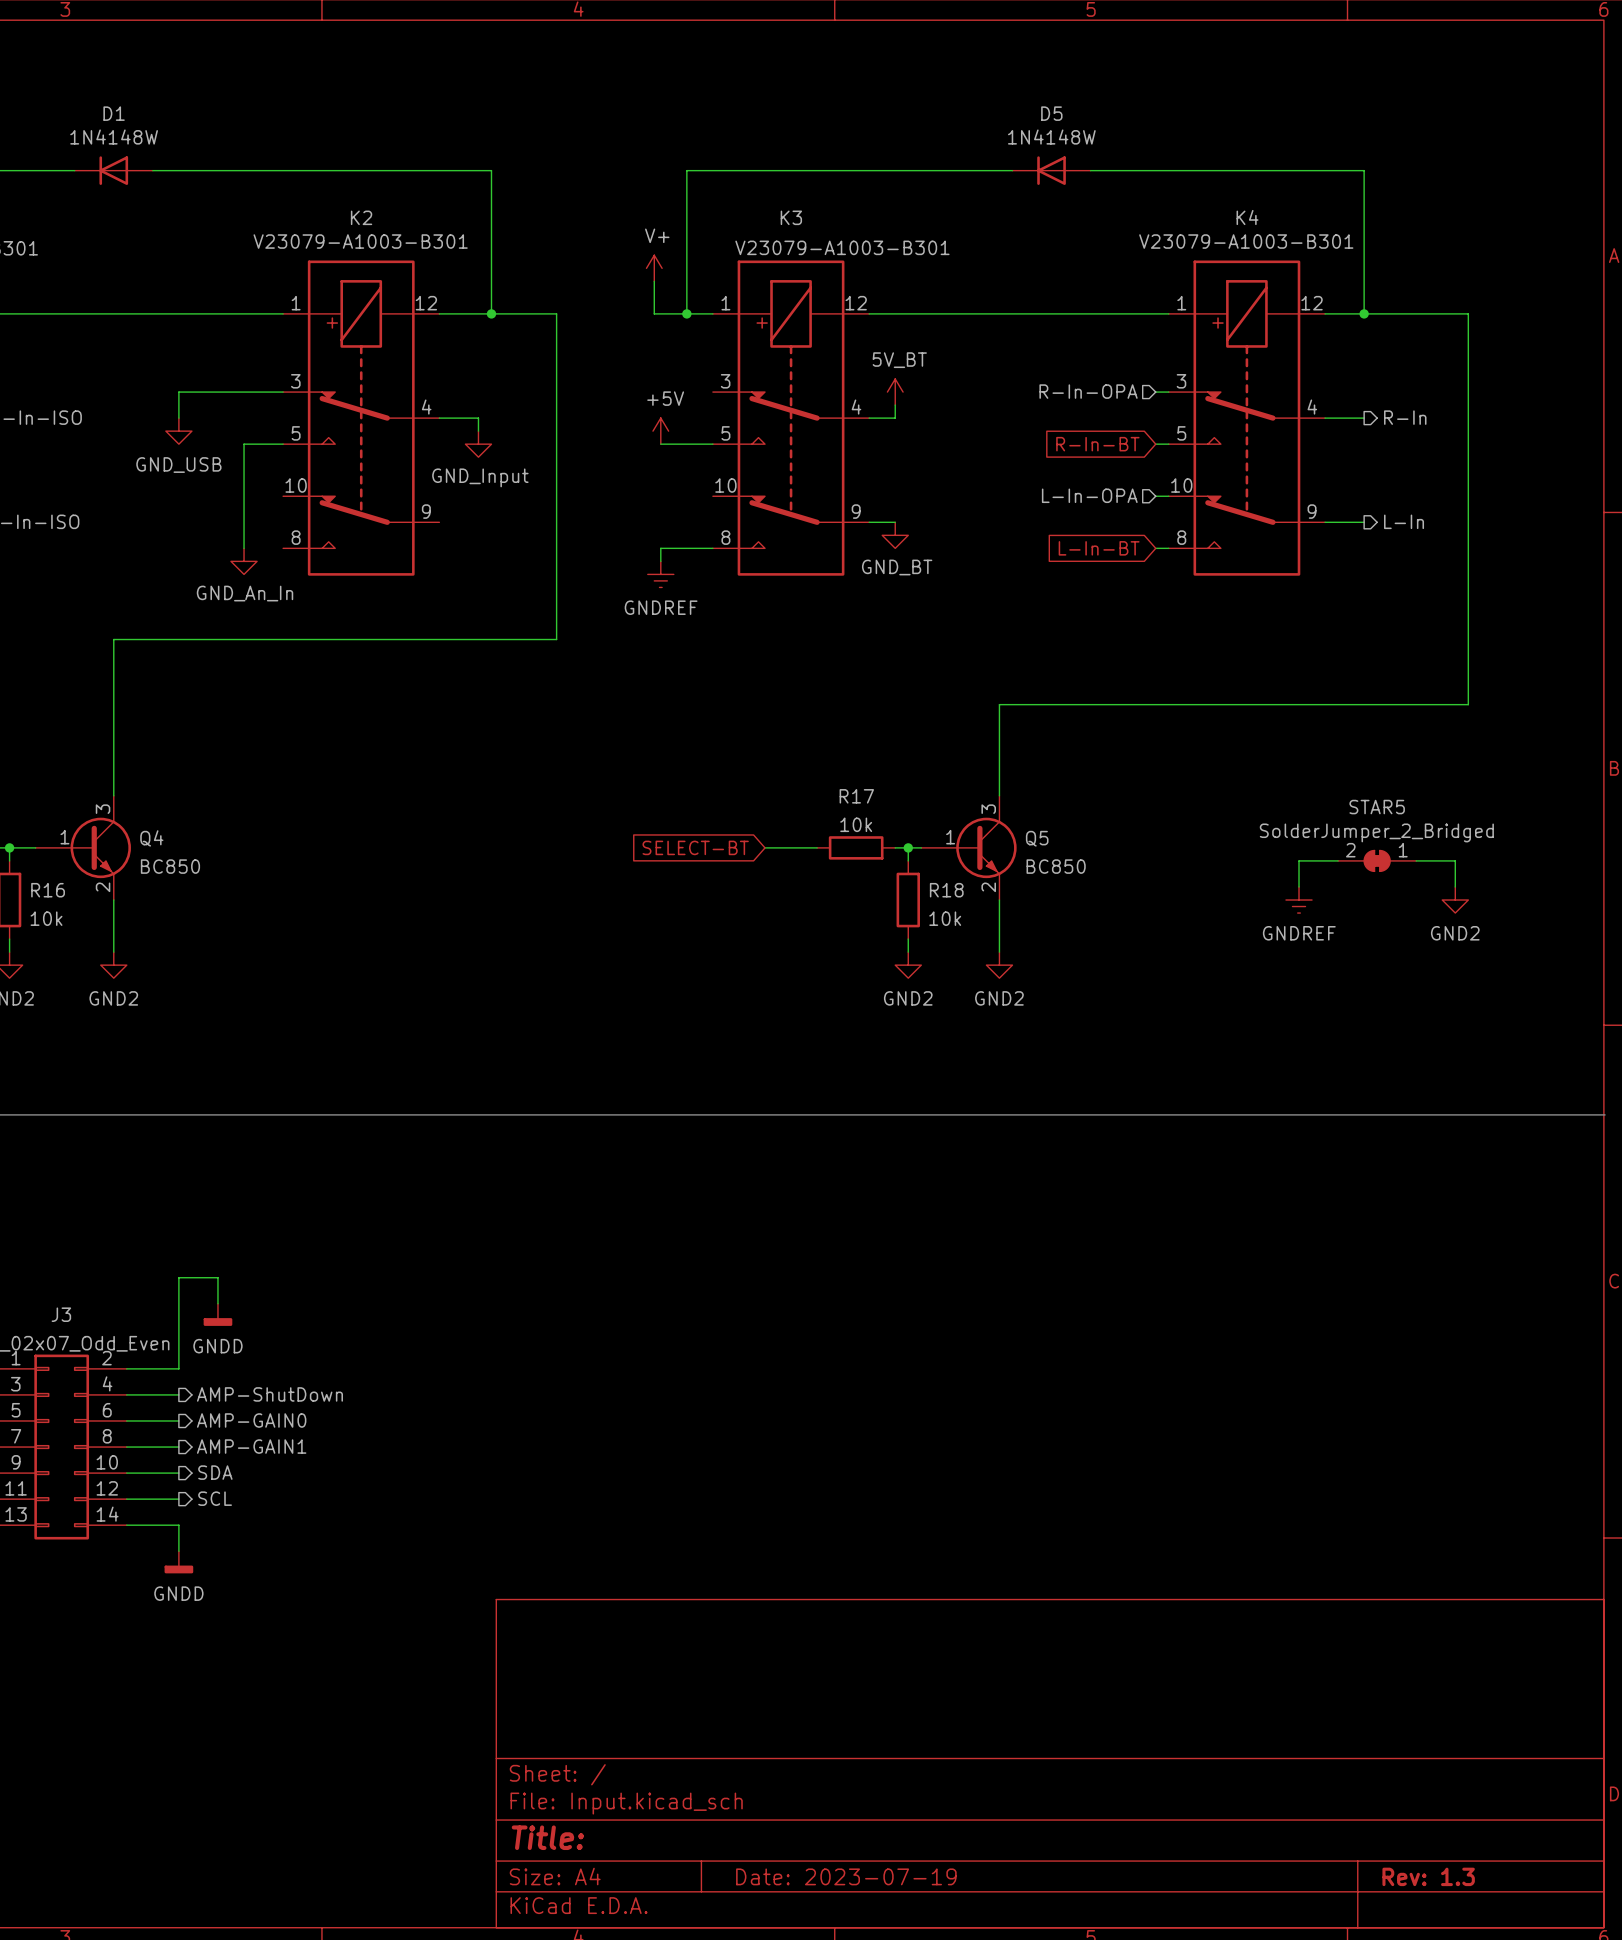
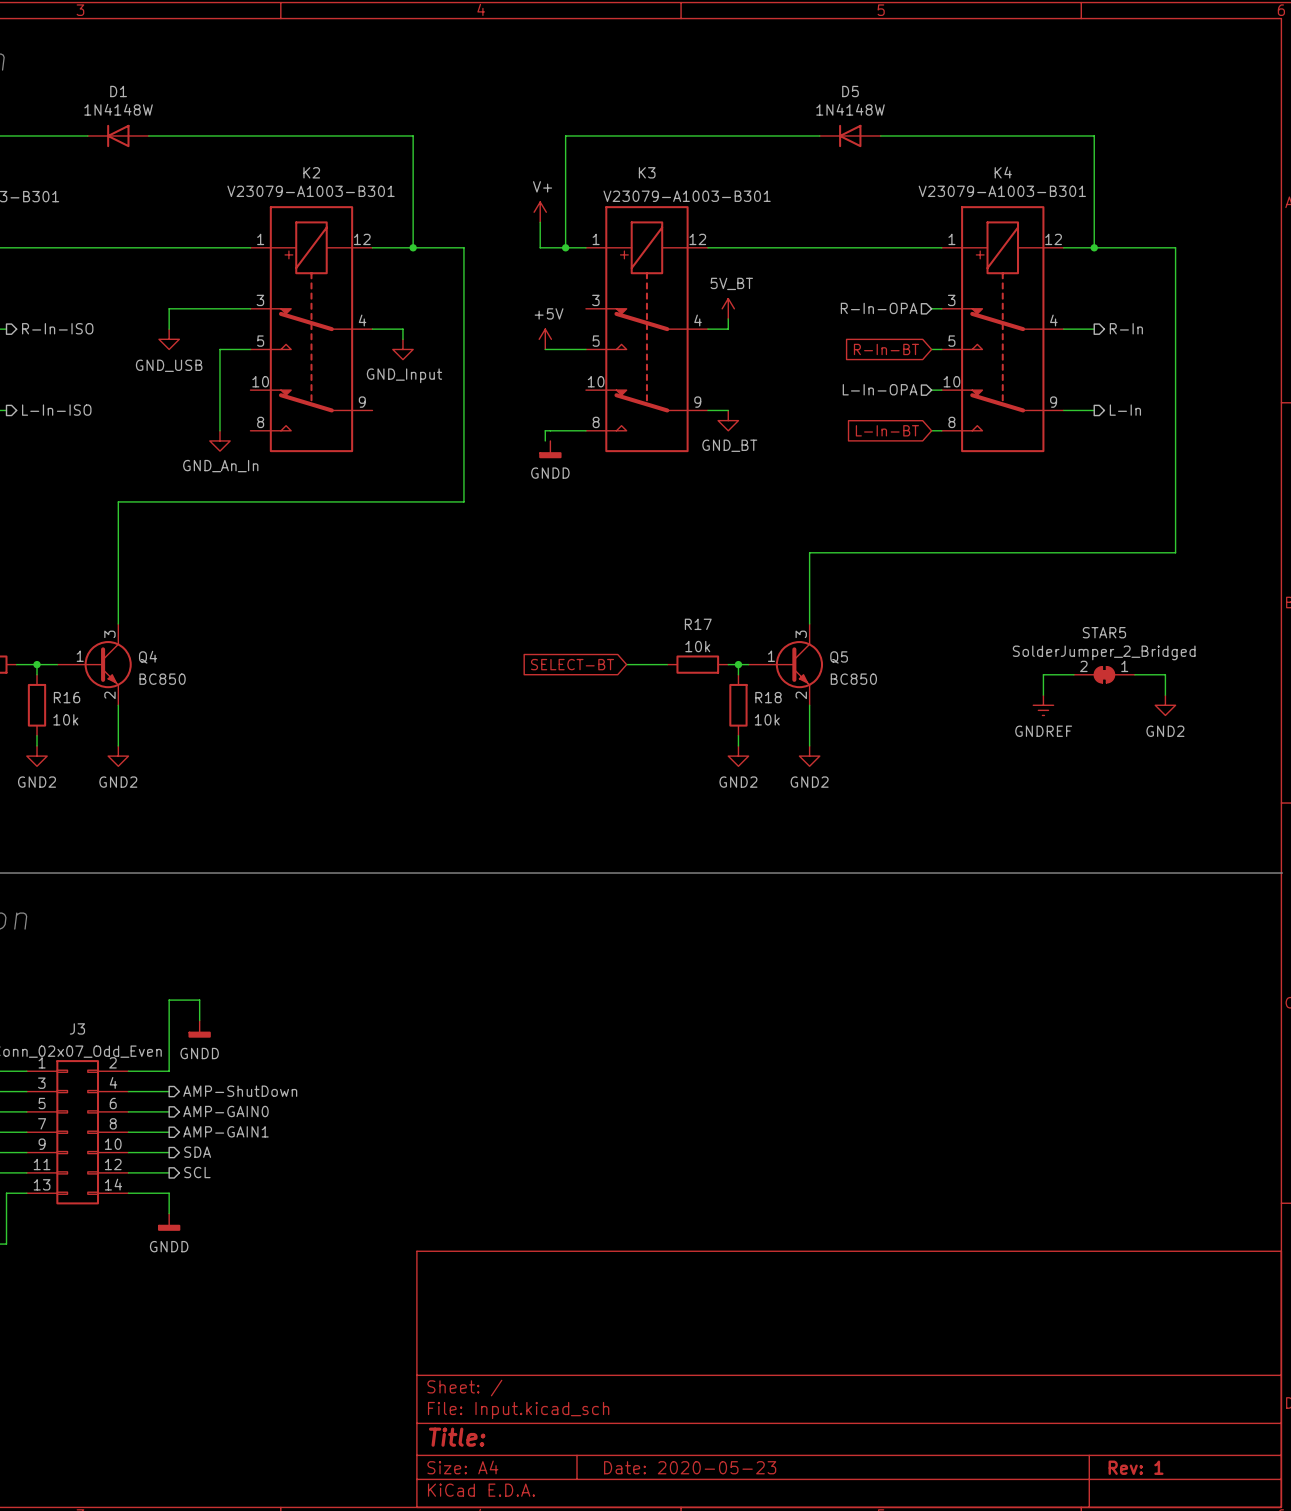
power symbol: GNDREF (660, 574) -> GNDD (550, 449)
title block: Date: 2023-07-19 (846, 1876) -> Date: 2020-05-23 (690, 1467)
title block: Rev: 1.3 (1428, 1876) -> Rev: 1 (1136, 1467)

